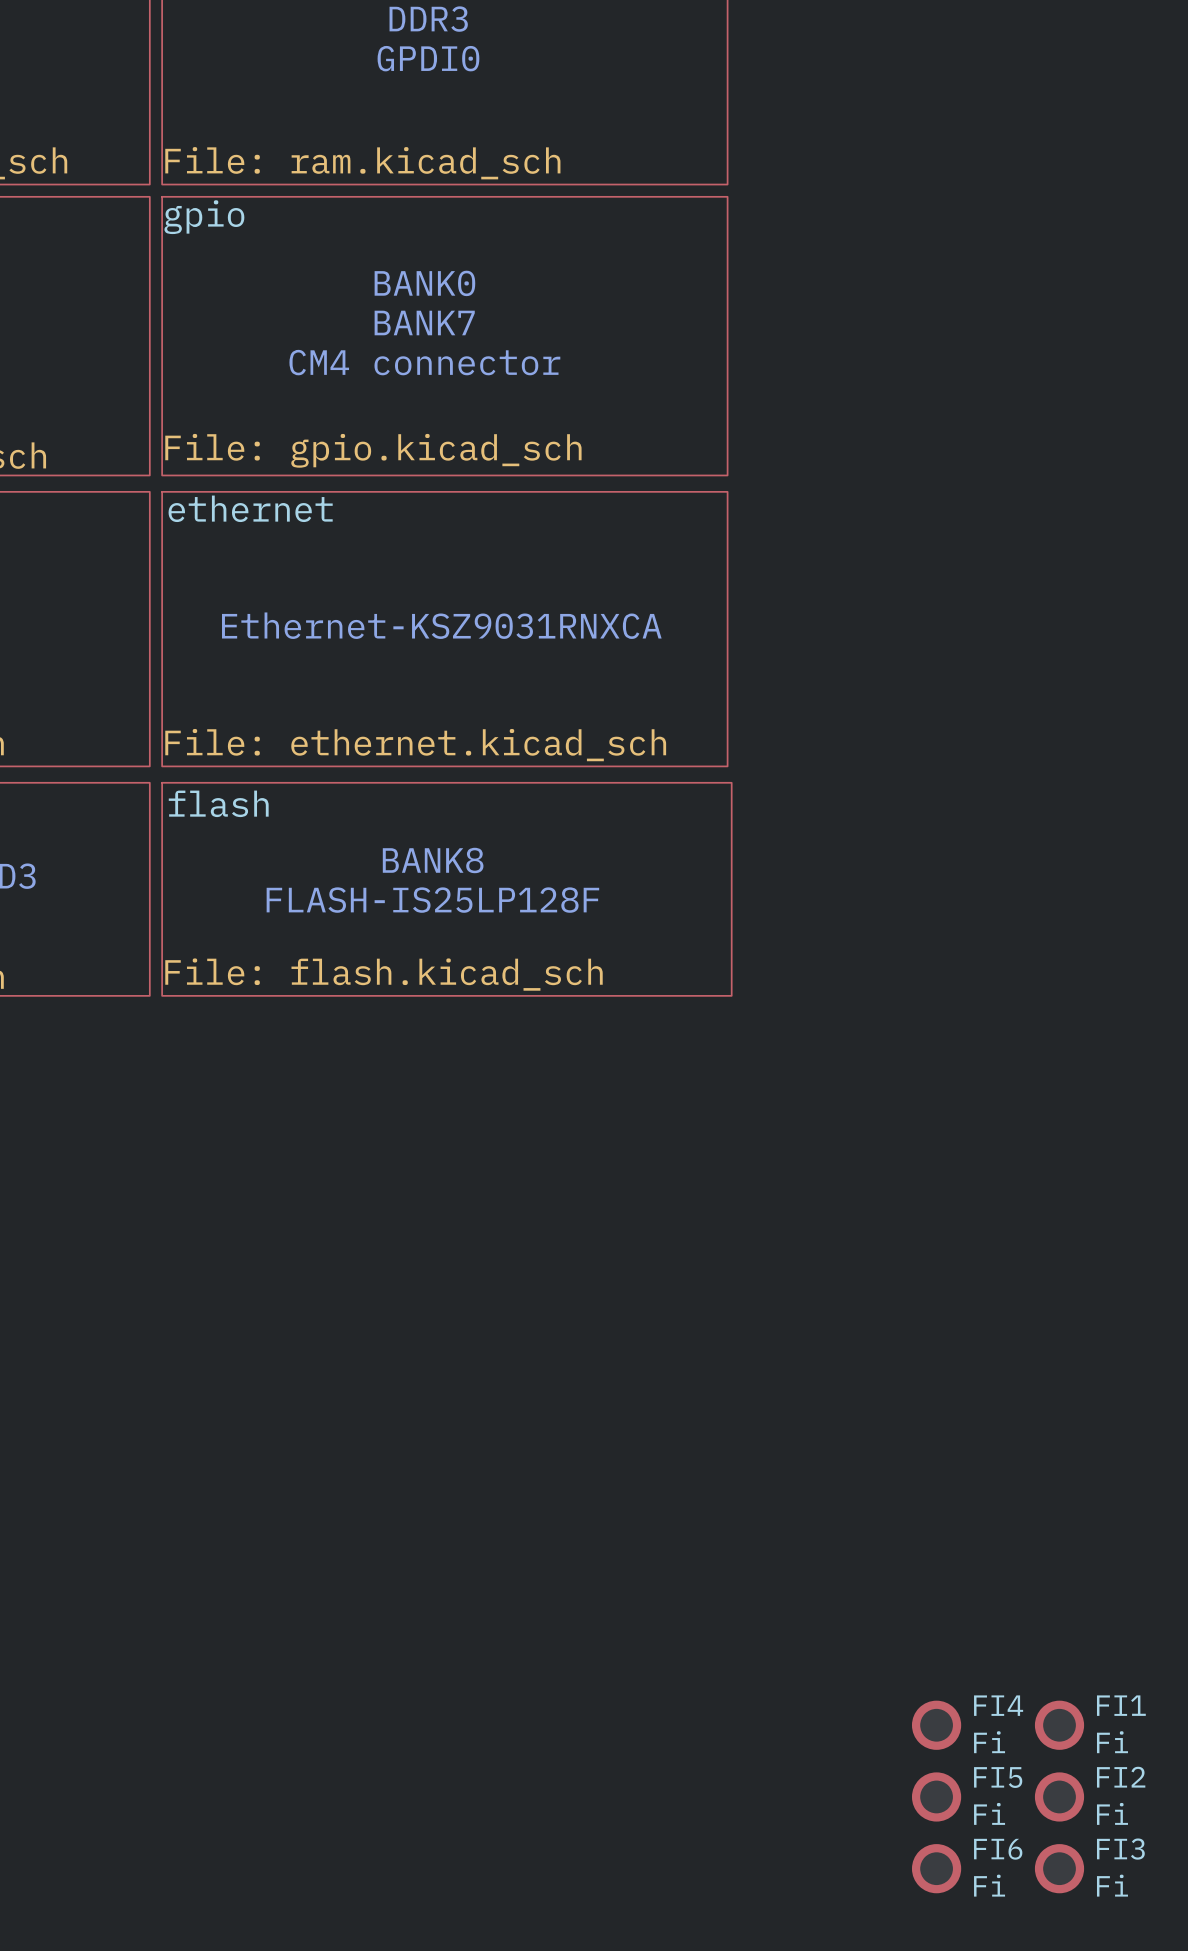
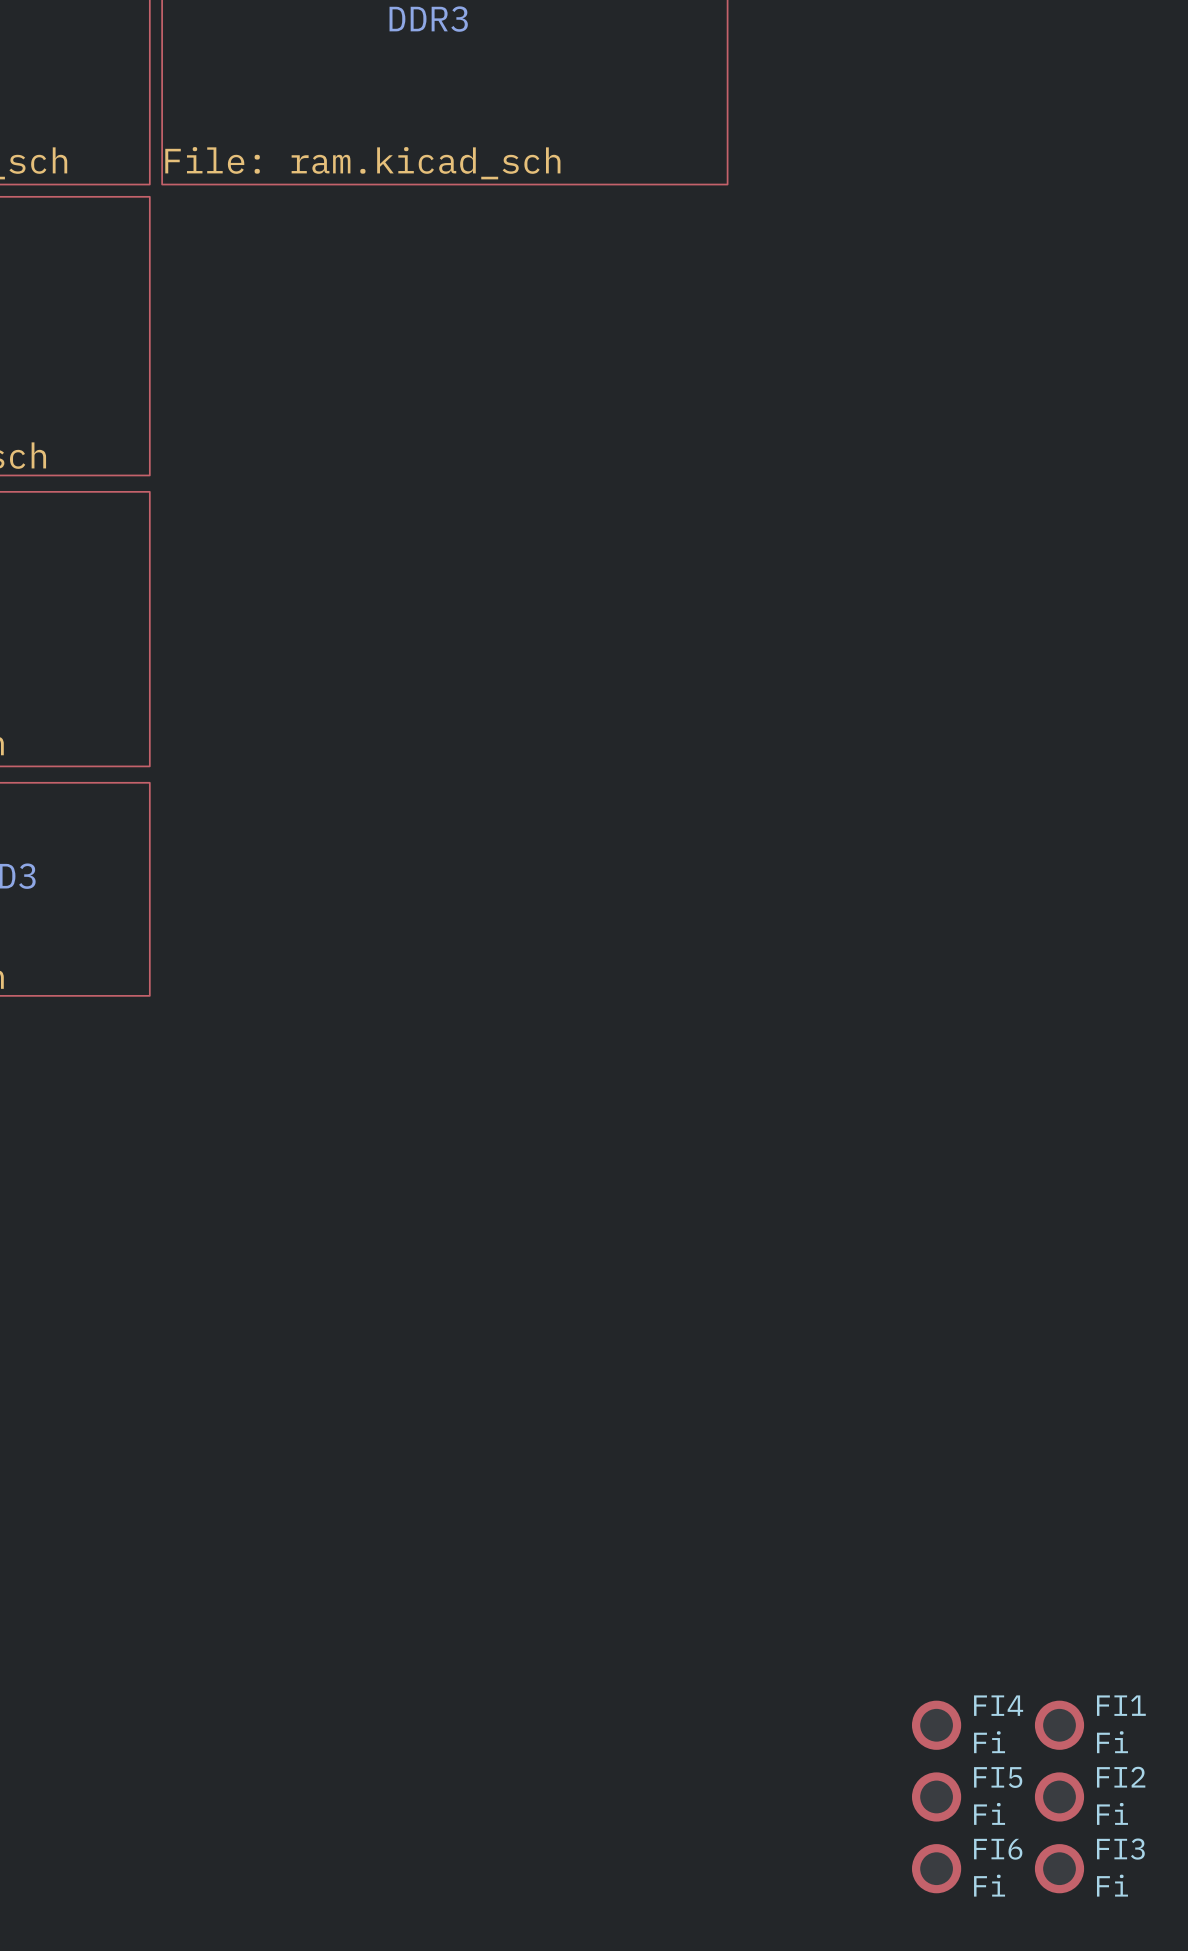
text: GPDI0 (428, 58) -> none
text: BANK0 (424, 283) -> none
text: BANK7 (424, 322) -> none
sheet gpio: File: gpio.kicad_sch (444, 336) -> none
text: CM4 connector (424, 362) -> none
text: Ethernet-KSZ9031RNXCA (441, 625) -> none
sheet ethernet: File: ethernet.kicad_sch (444, 629) -> none
text: BANK8 (433, 860) -> none
sheet flash: File: flash.kicad_sch (446, 889) -> none
text: FLASH-IS25LP128F (432, 900) -> none

